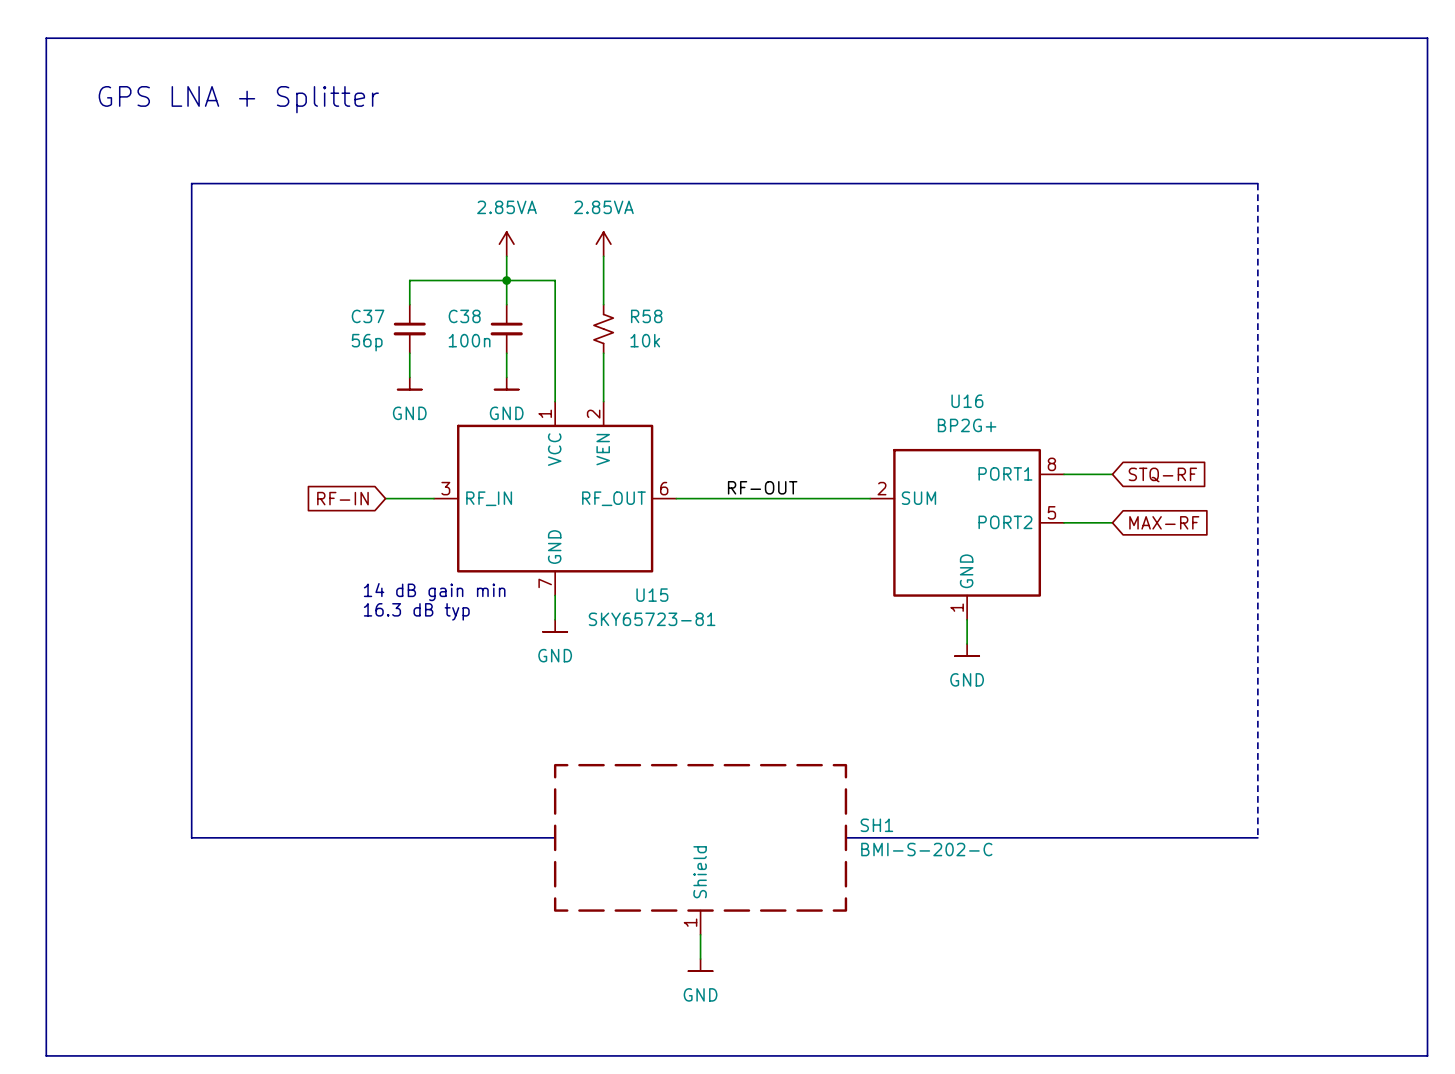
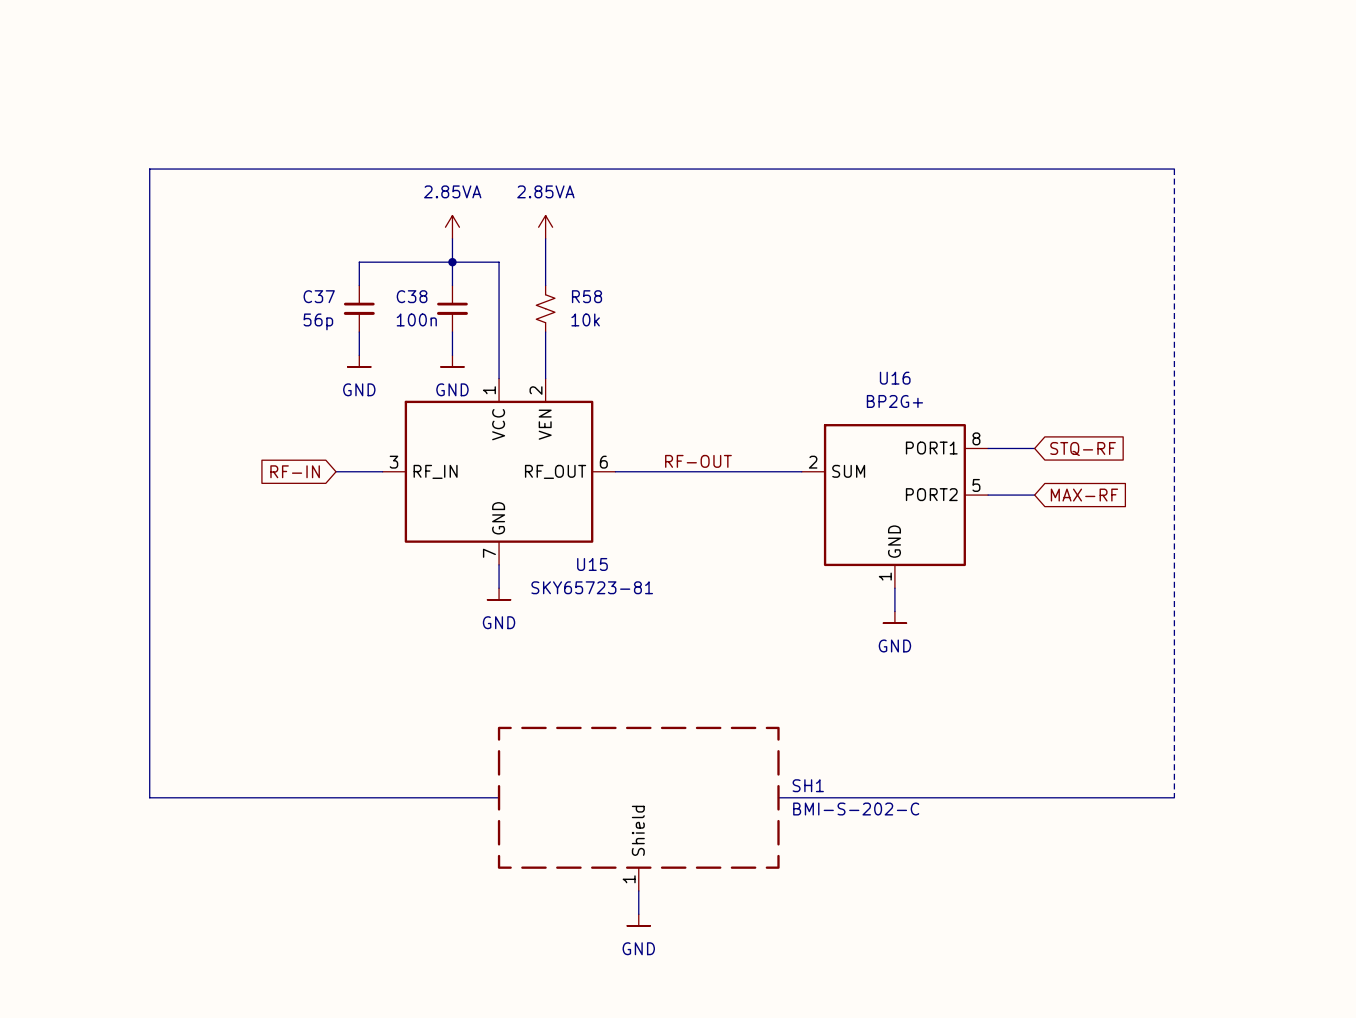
line: (46, 38) (46, 1055) (1427, 1055) (1427, 38) (46, 38) -> none
text: GPS LNA + Splitter (238, 99) -> none
text: 14 dB gain min (434, 592) -> none
text: 16.3 dB typ (416, 611) -> none

